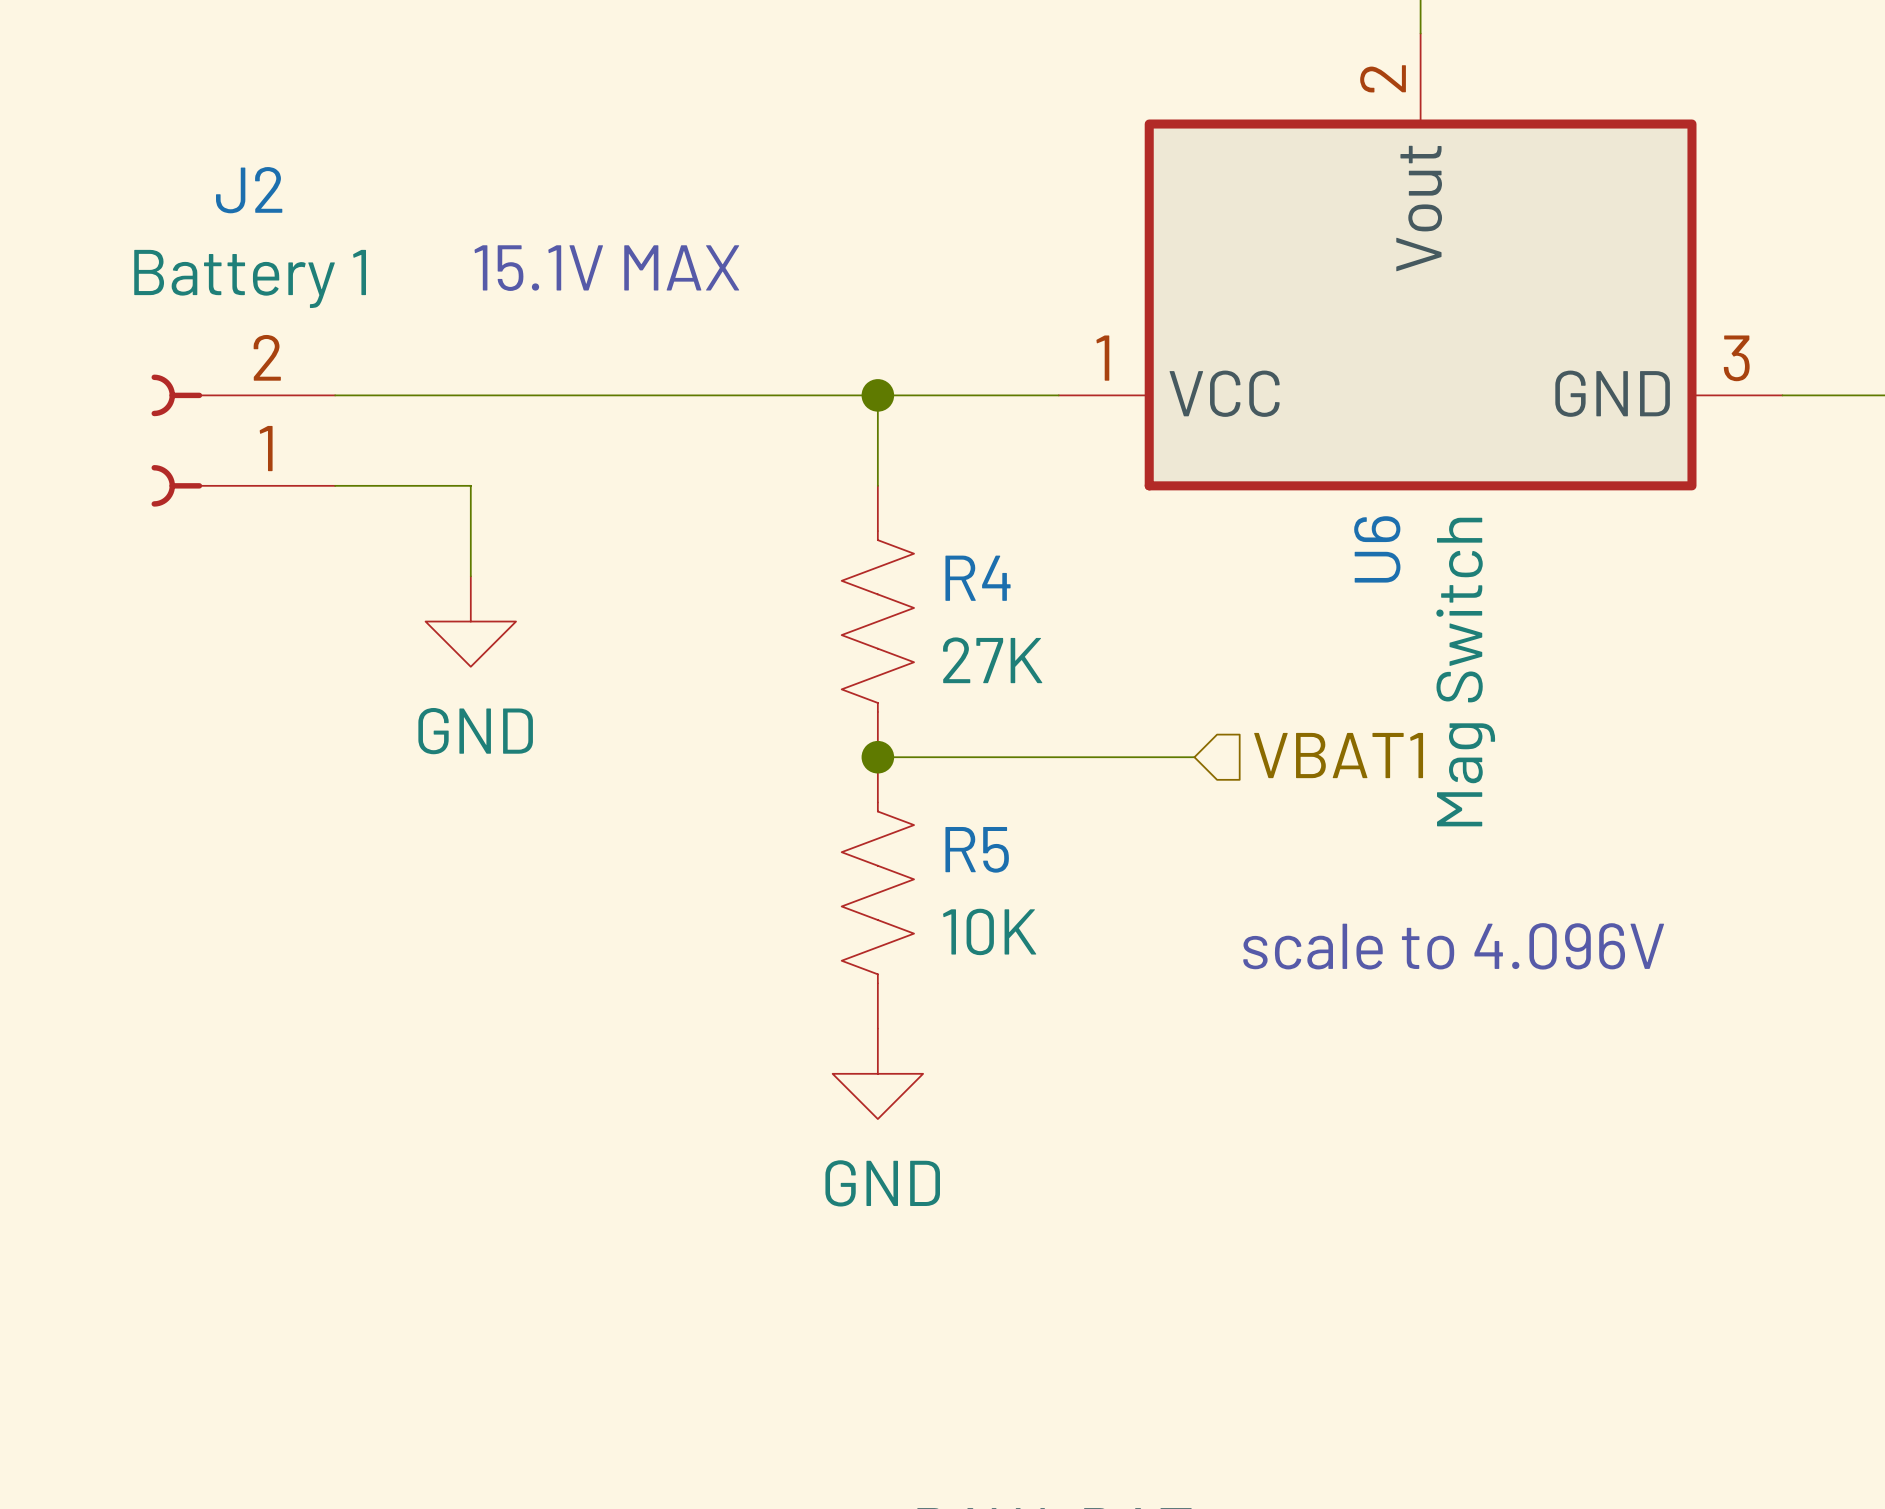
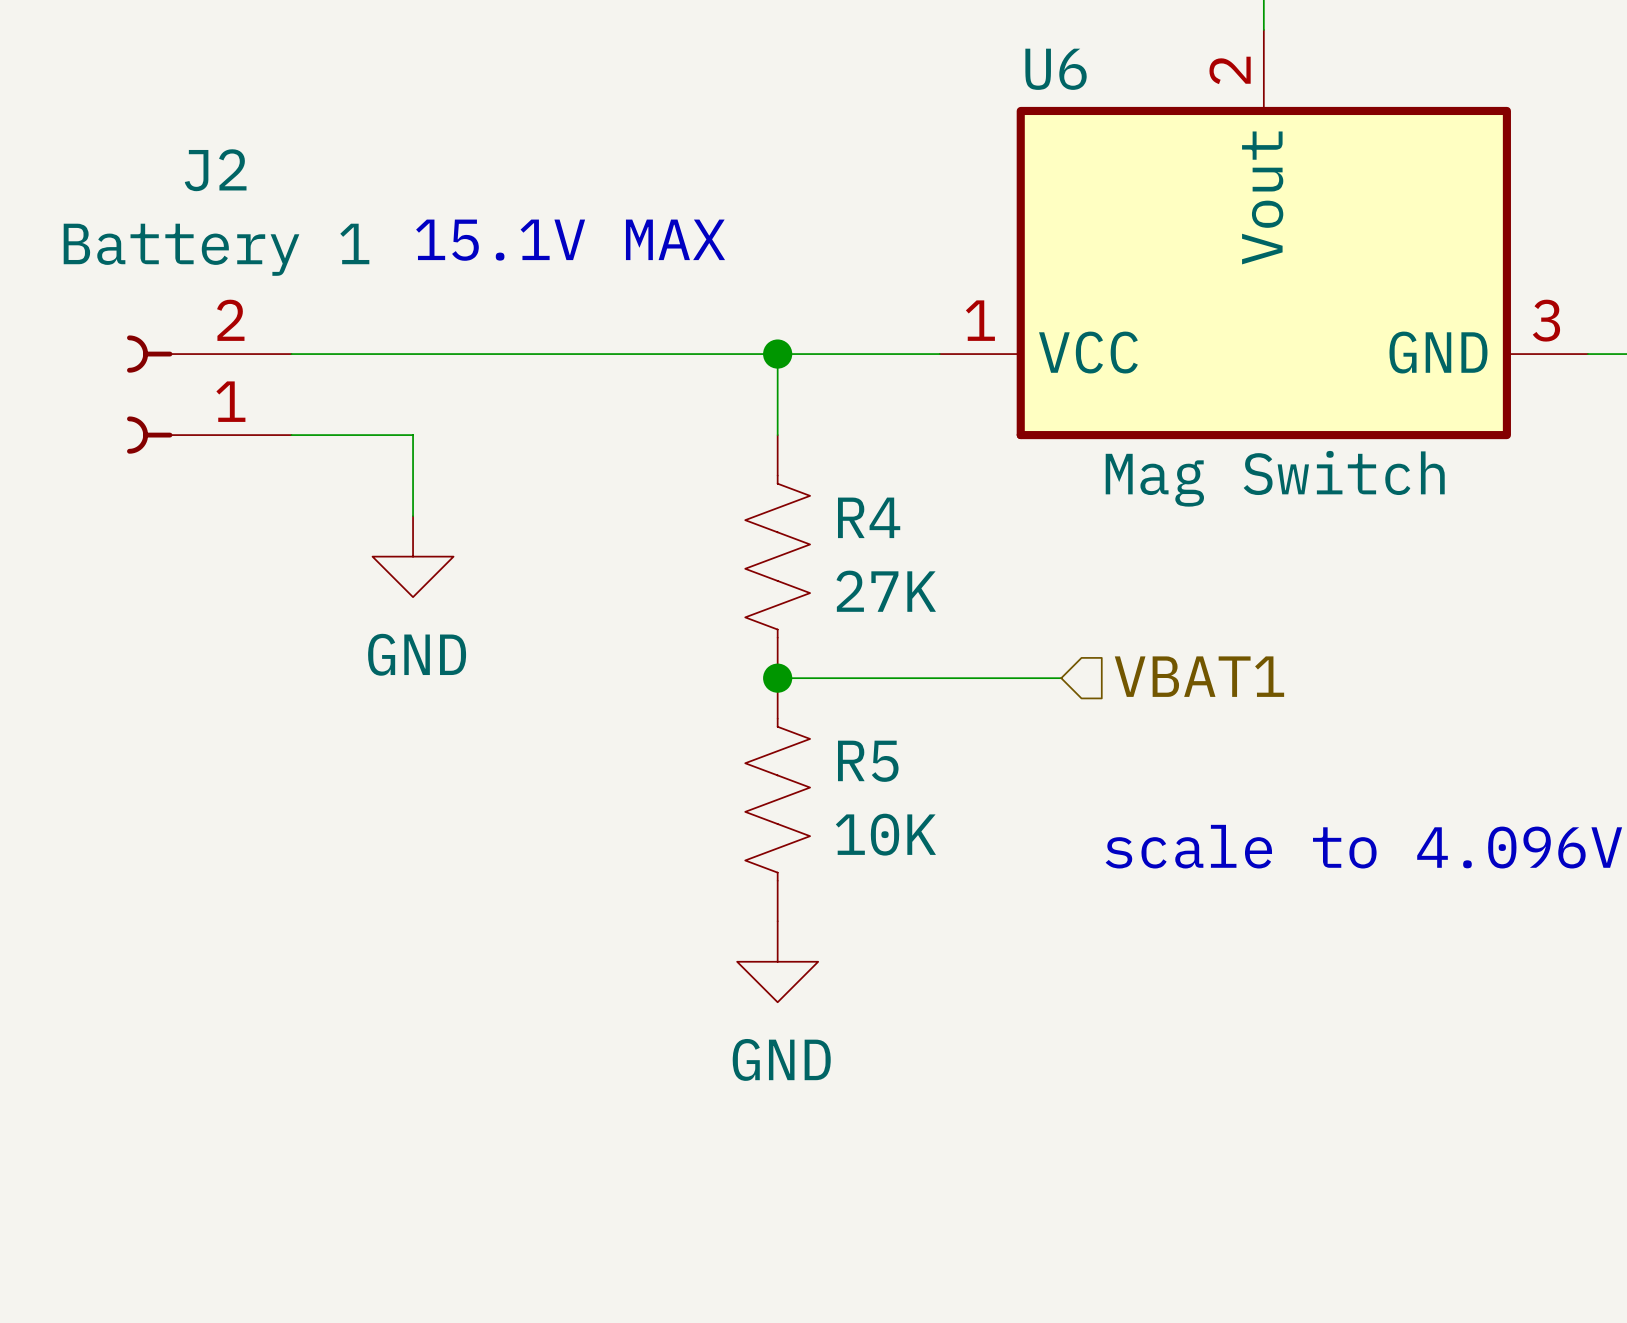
U6 name rotation: 0° (1377, 549) -> 90° clockwise (1056, 69)
U6 name position: U6 (1377, 549) -> U6 (1056, 69)
U6 value rotation: 0° (1465, 672) -> 90° clockwise (1275, 478)

